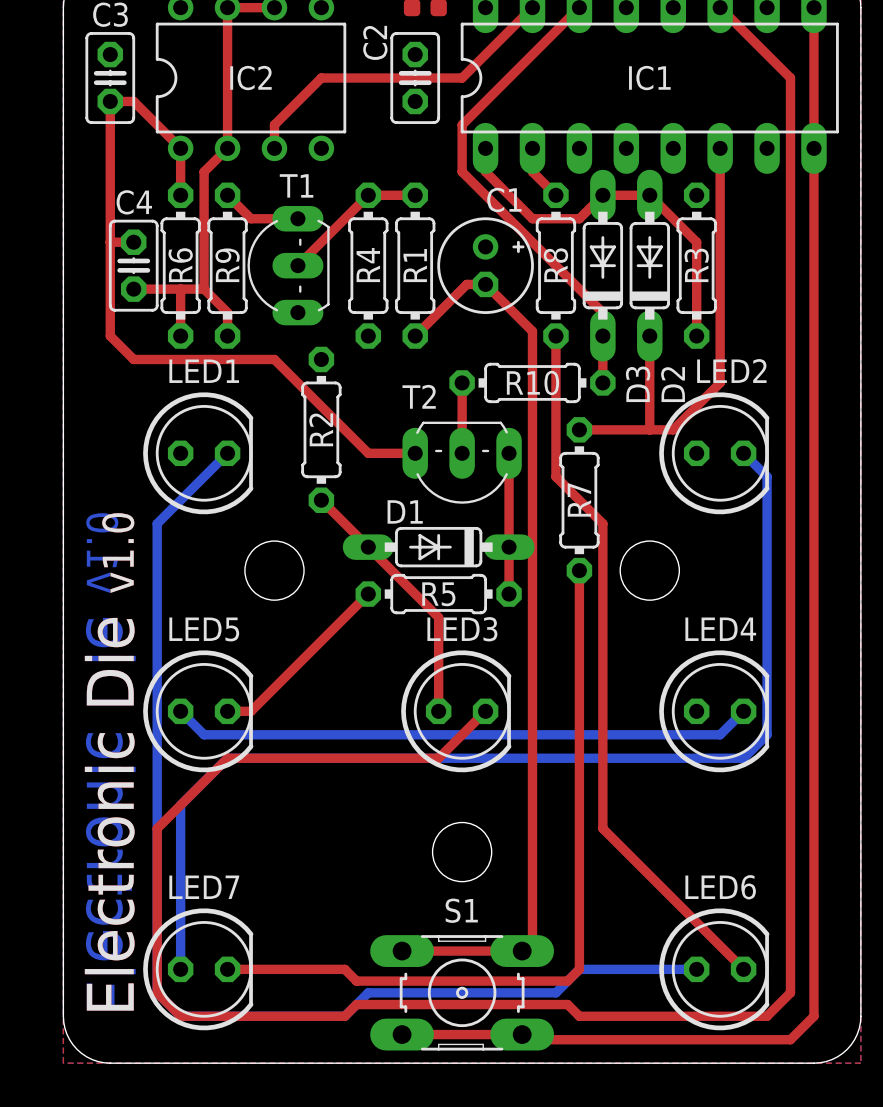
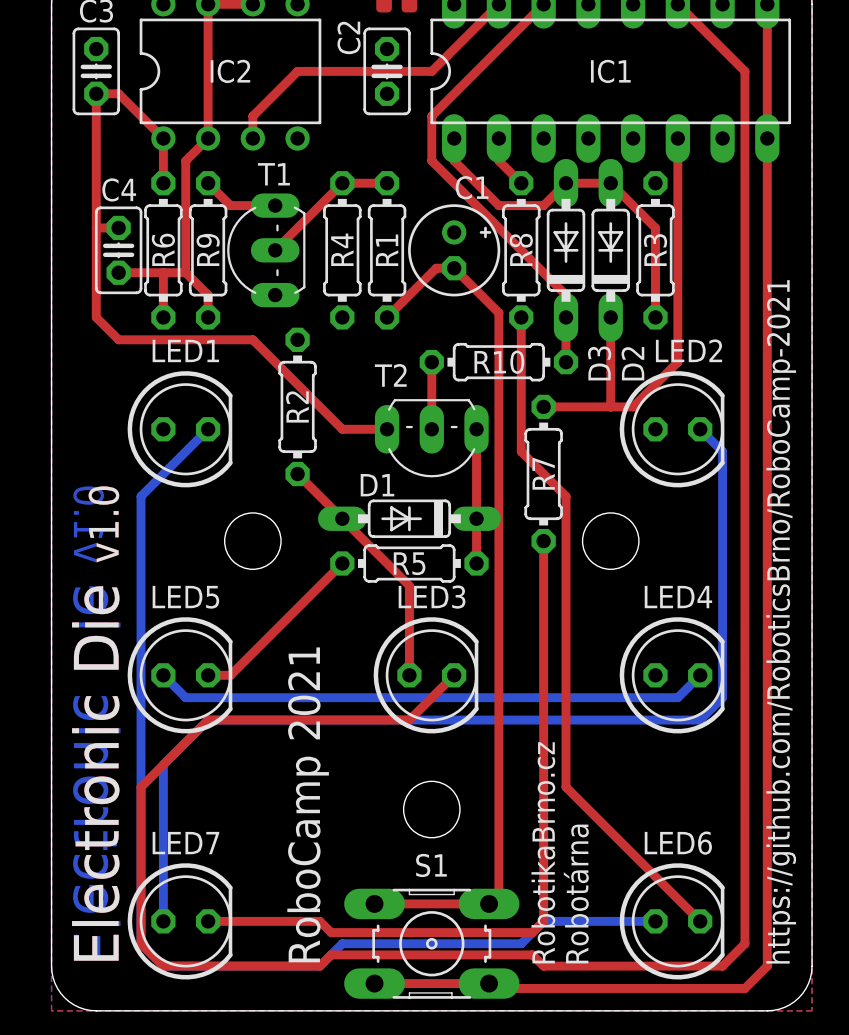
text: none -> https://github.com/RoboticsBrno/RoboCamp-2021 (781, 621)
text: none -> RoboCamp 2021 (308, 804)
text: none -> RobotikaBrno.cz (543, 852)
text: none -> Robotárna (576, 893)

